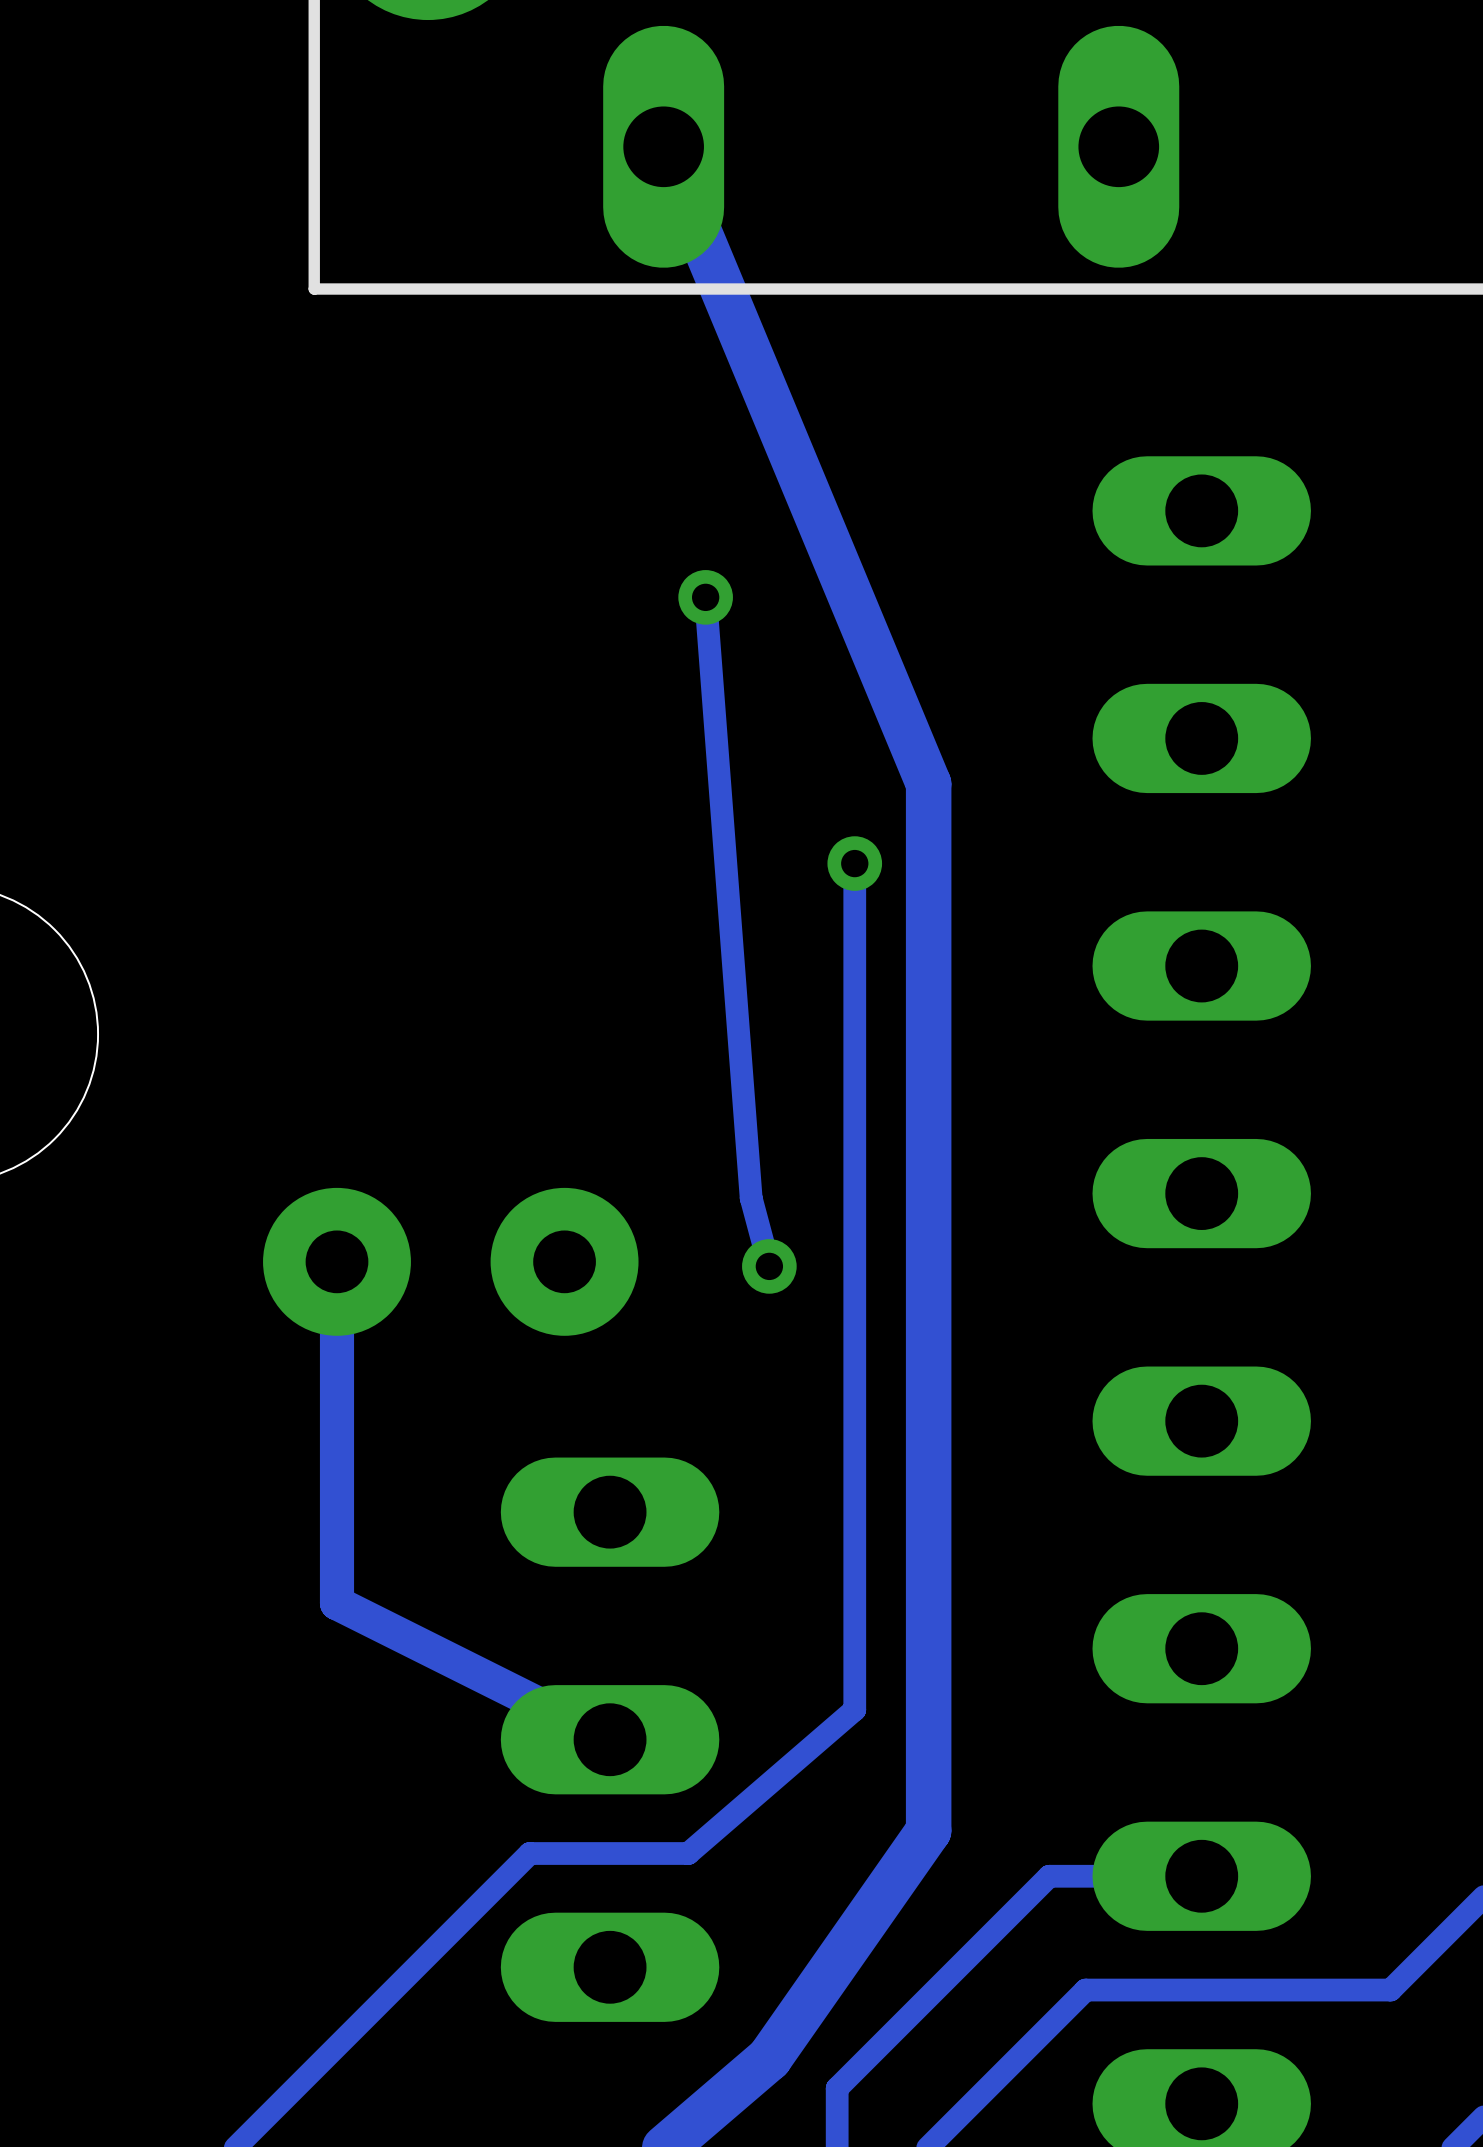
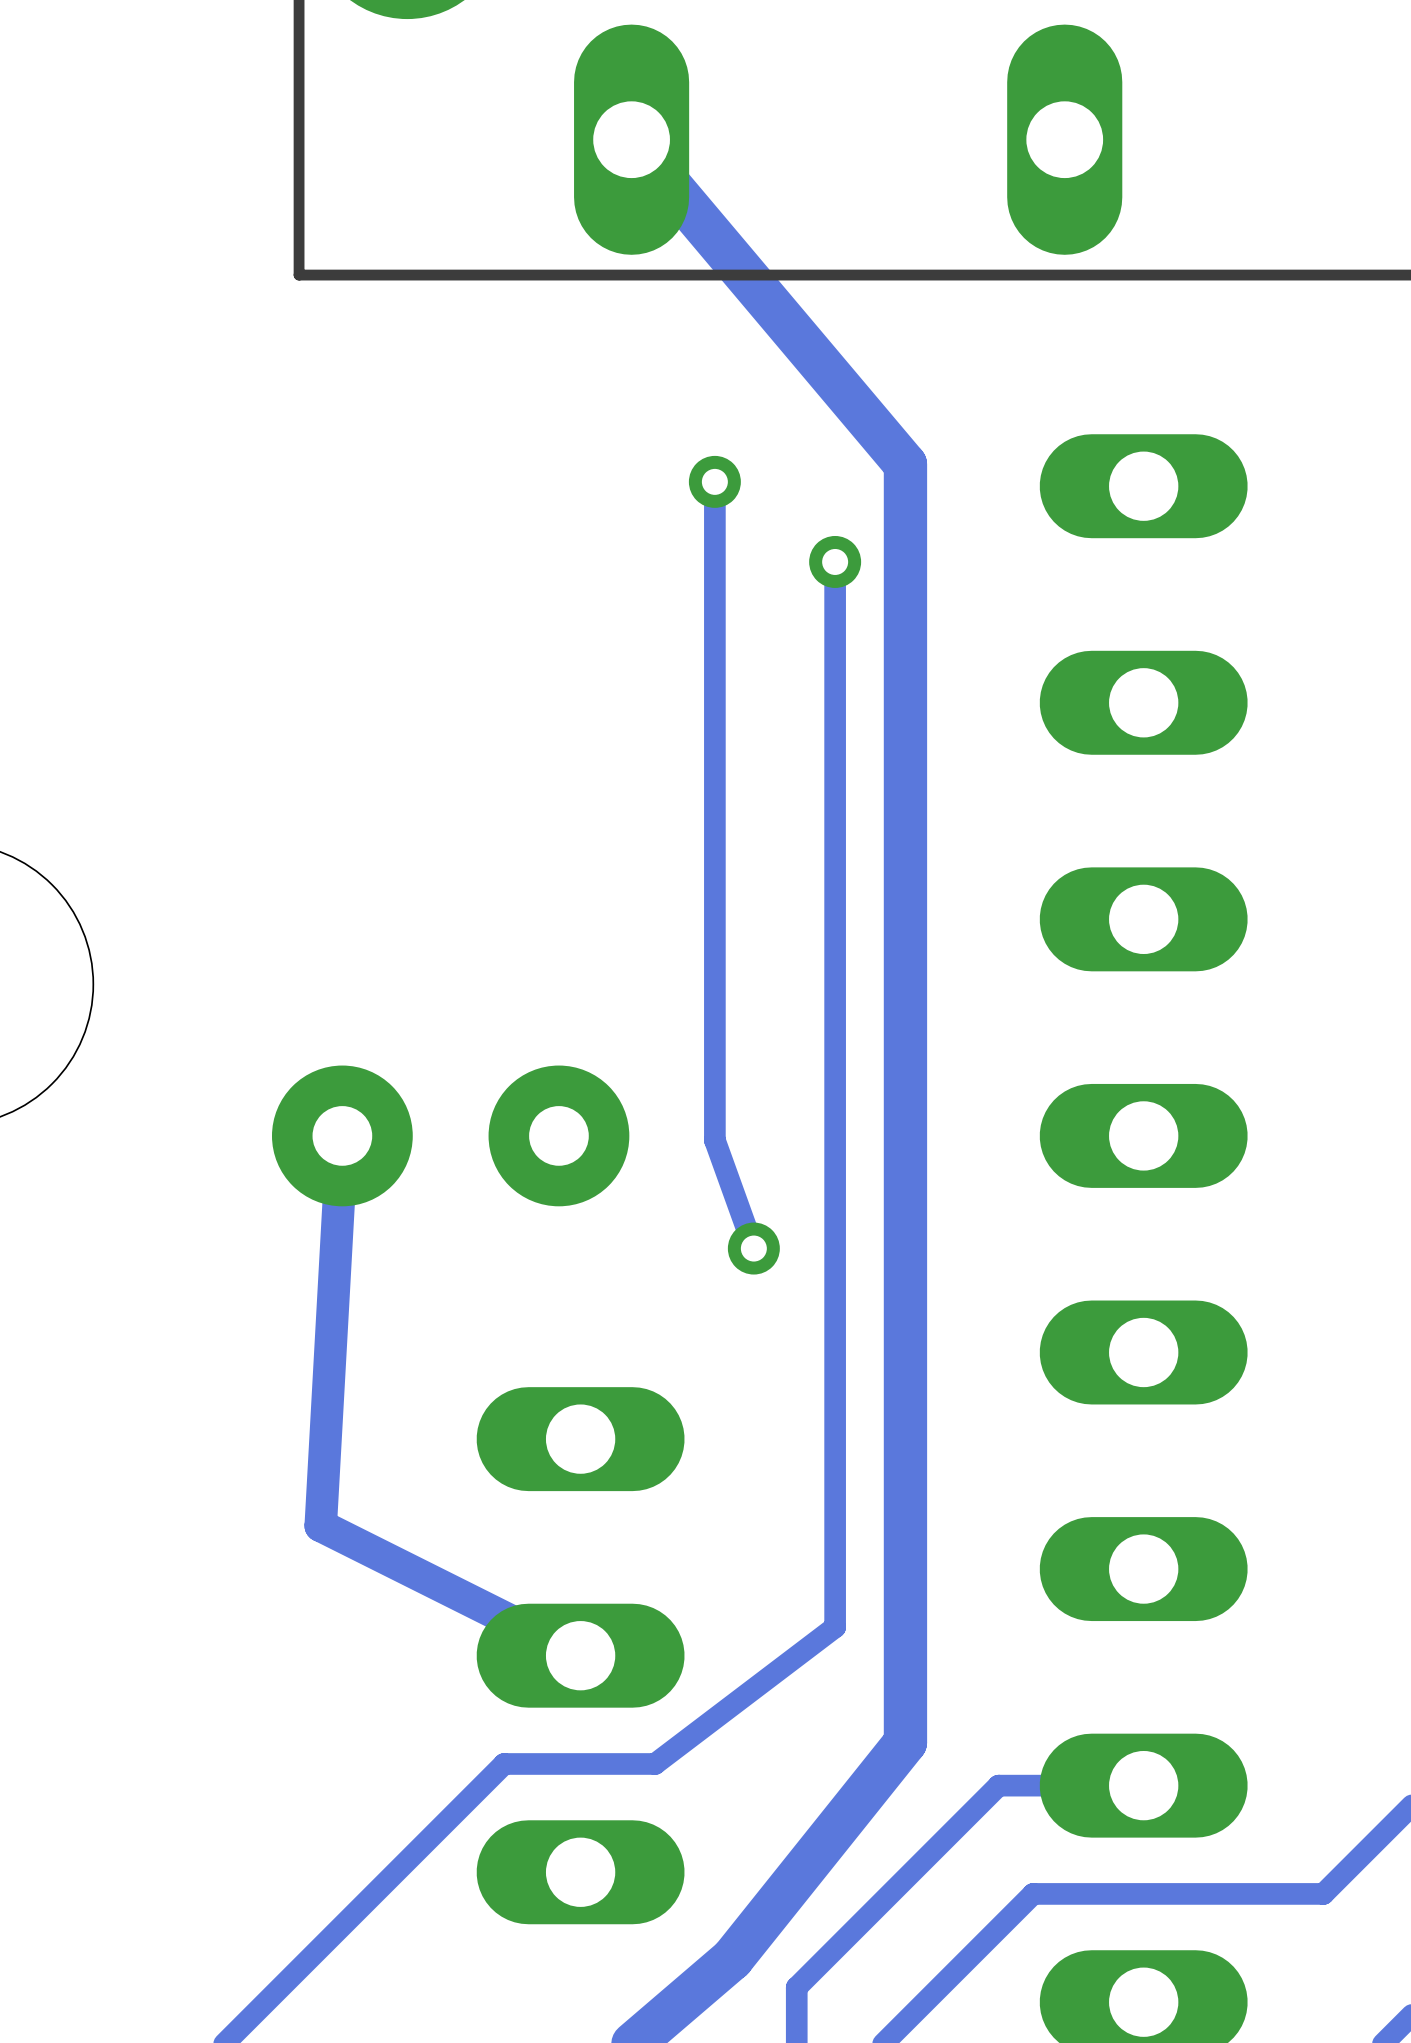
track: (663, 146) (928, 783) (928, 1830) (769, 2058) -> (631, 139) (905, 464) (905, 1742) (732, 1958)
track: none -> (714, 481) (714, 1140) (753, 1248)
via: none -> (714, 481)
via: none -> (835, 561)
track: (705, 597) (751, 1198) (769, 1266) -> none
via: (705, 597) -> none
track: (854, 863) (854, 1709) (688, 1853) -> (835, 561) (835, 1627) (655, 1763)
via: (854, 863) -> none
track: (336, 1261) (336, 1603) -> (342, 1135) (320, 1525)
part position: (450, 1261) -> (450, 1135)
via position: (769, 1266) -> (753, 1248)

